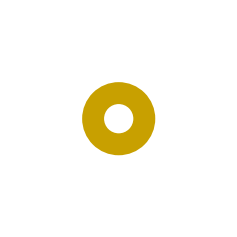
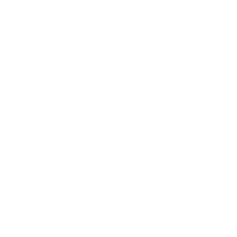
part: (118, 118) -> none

